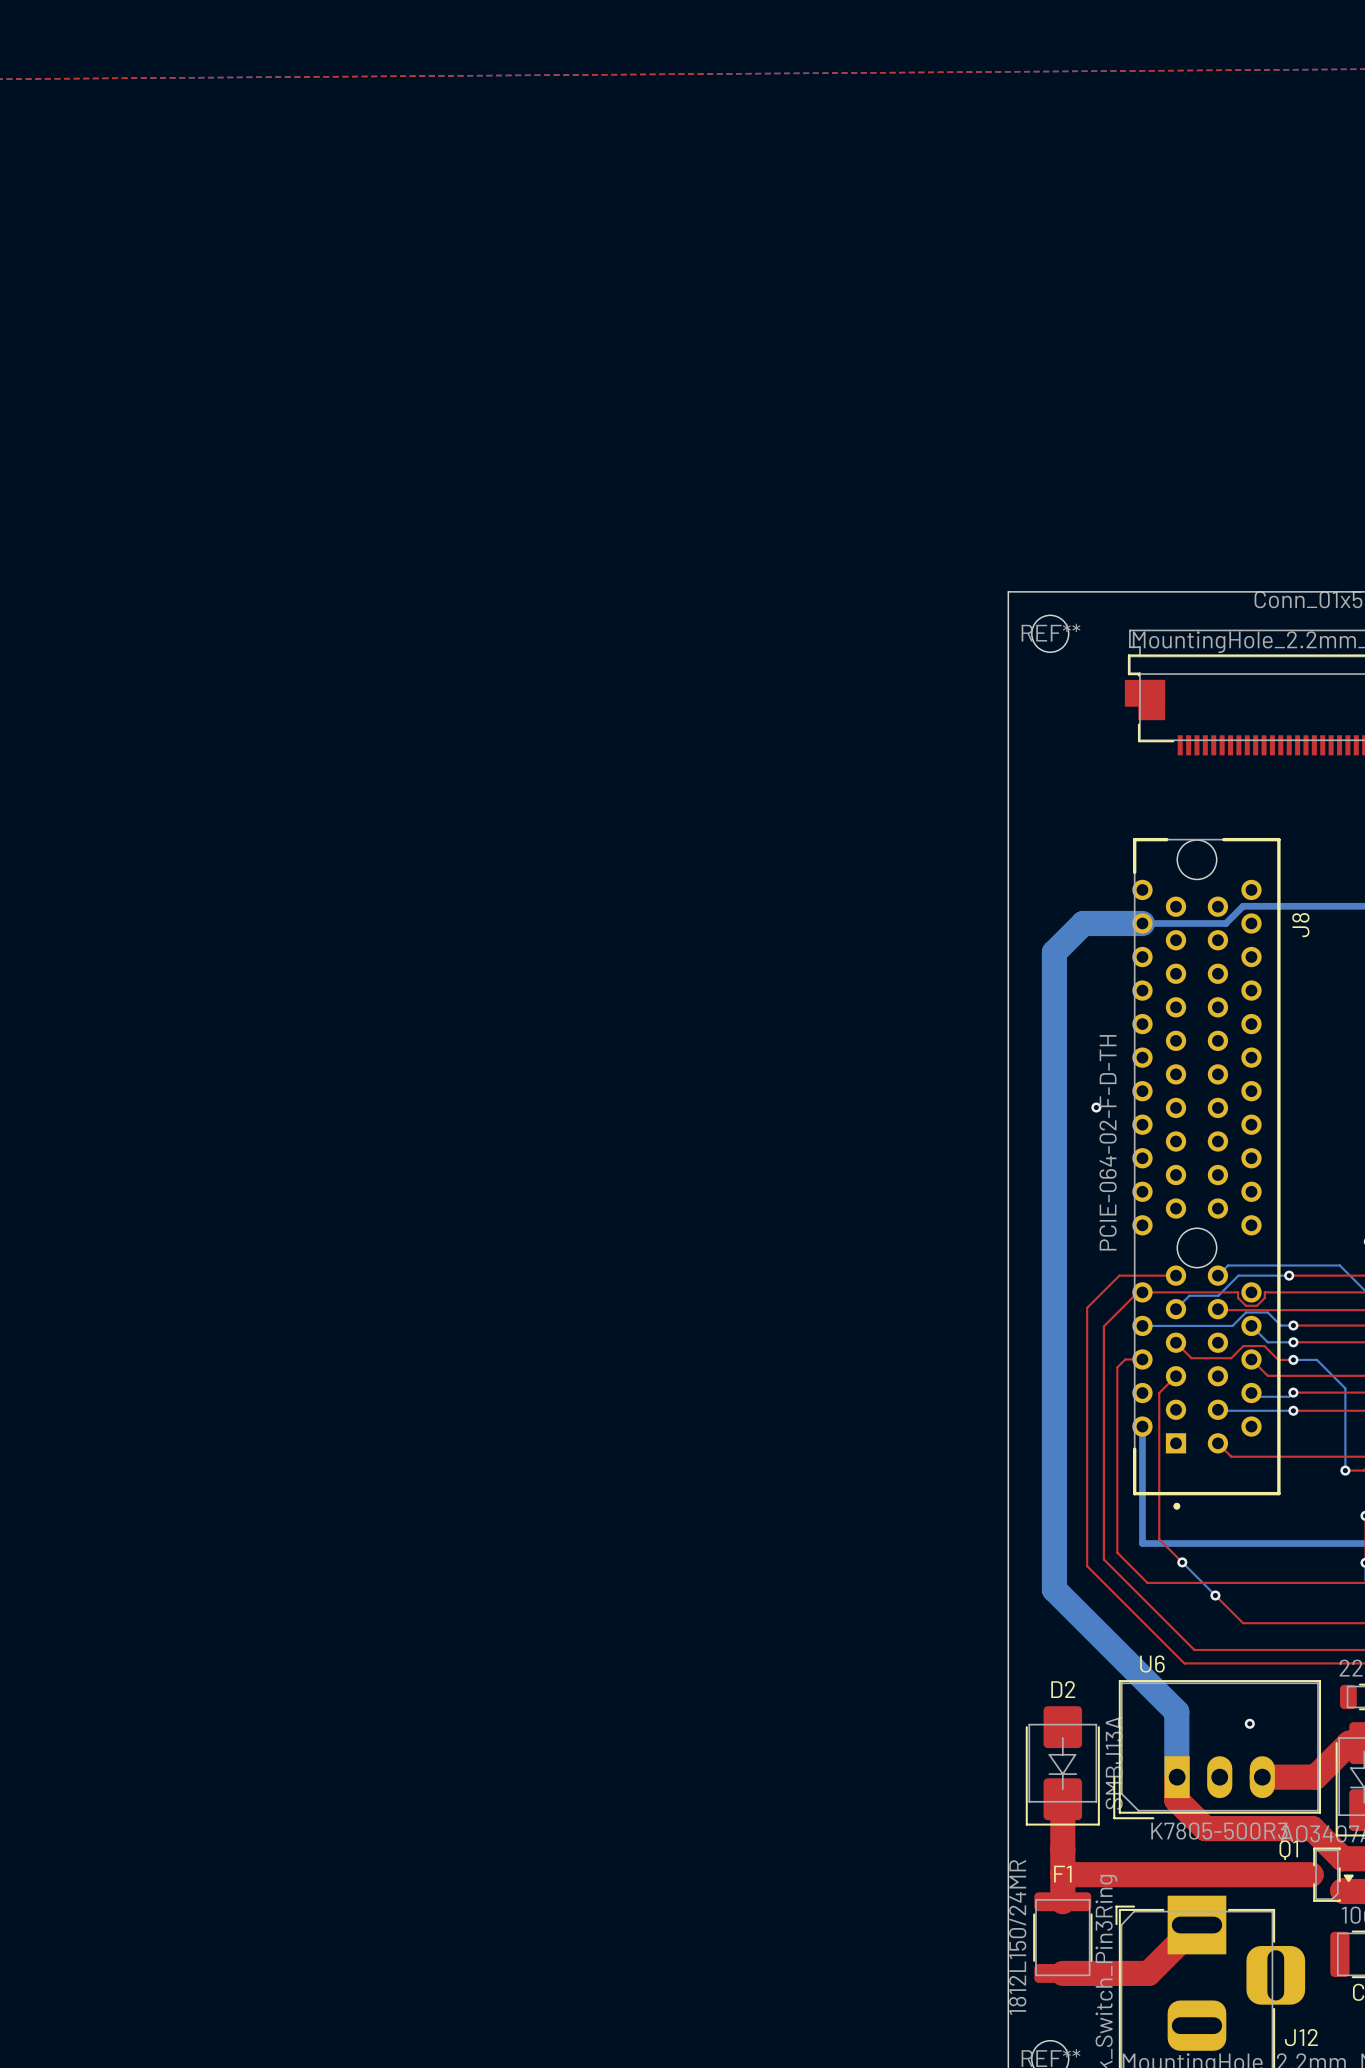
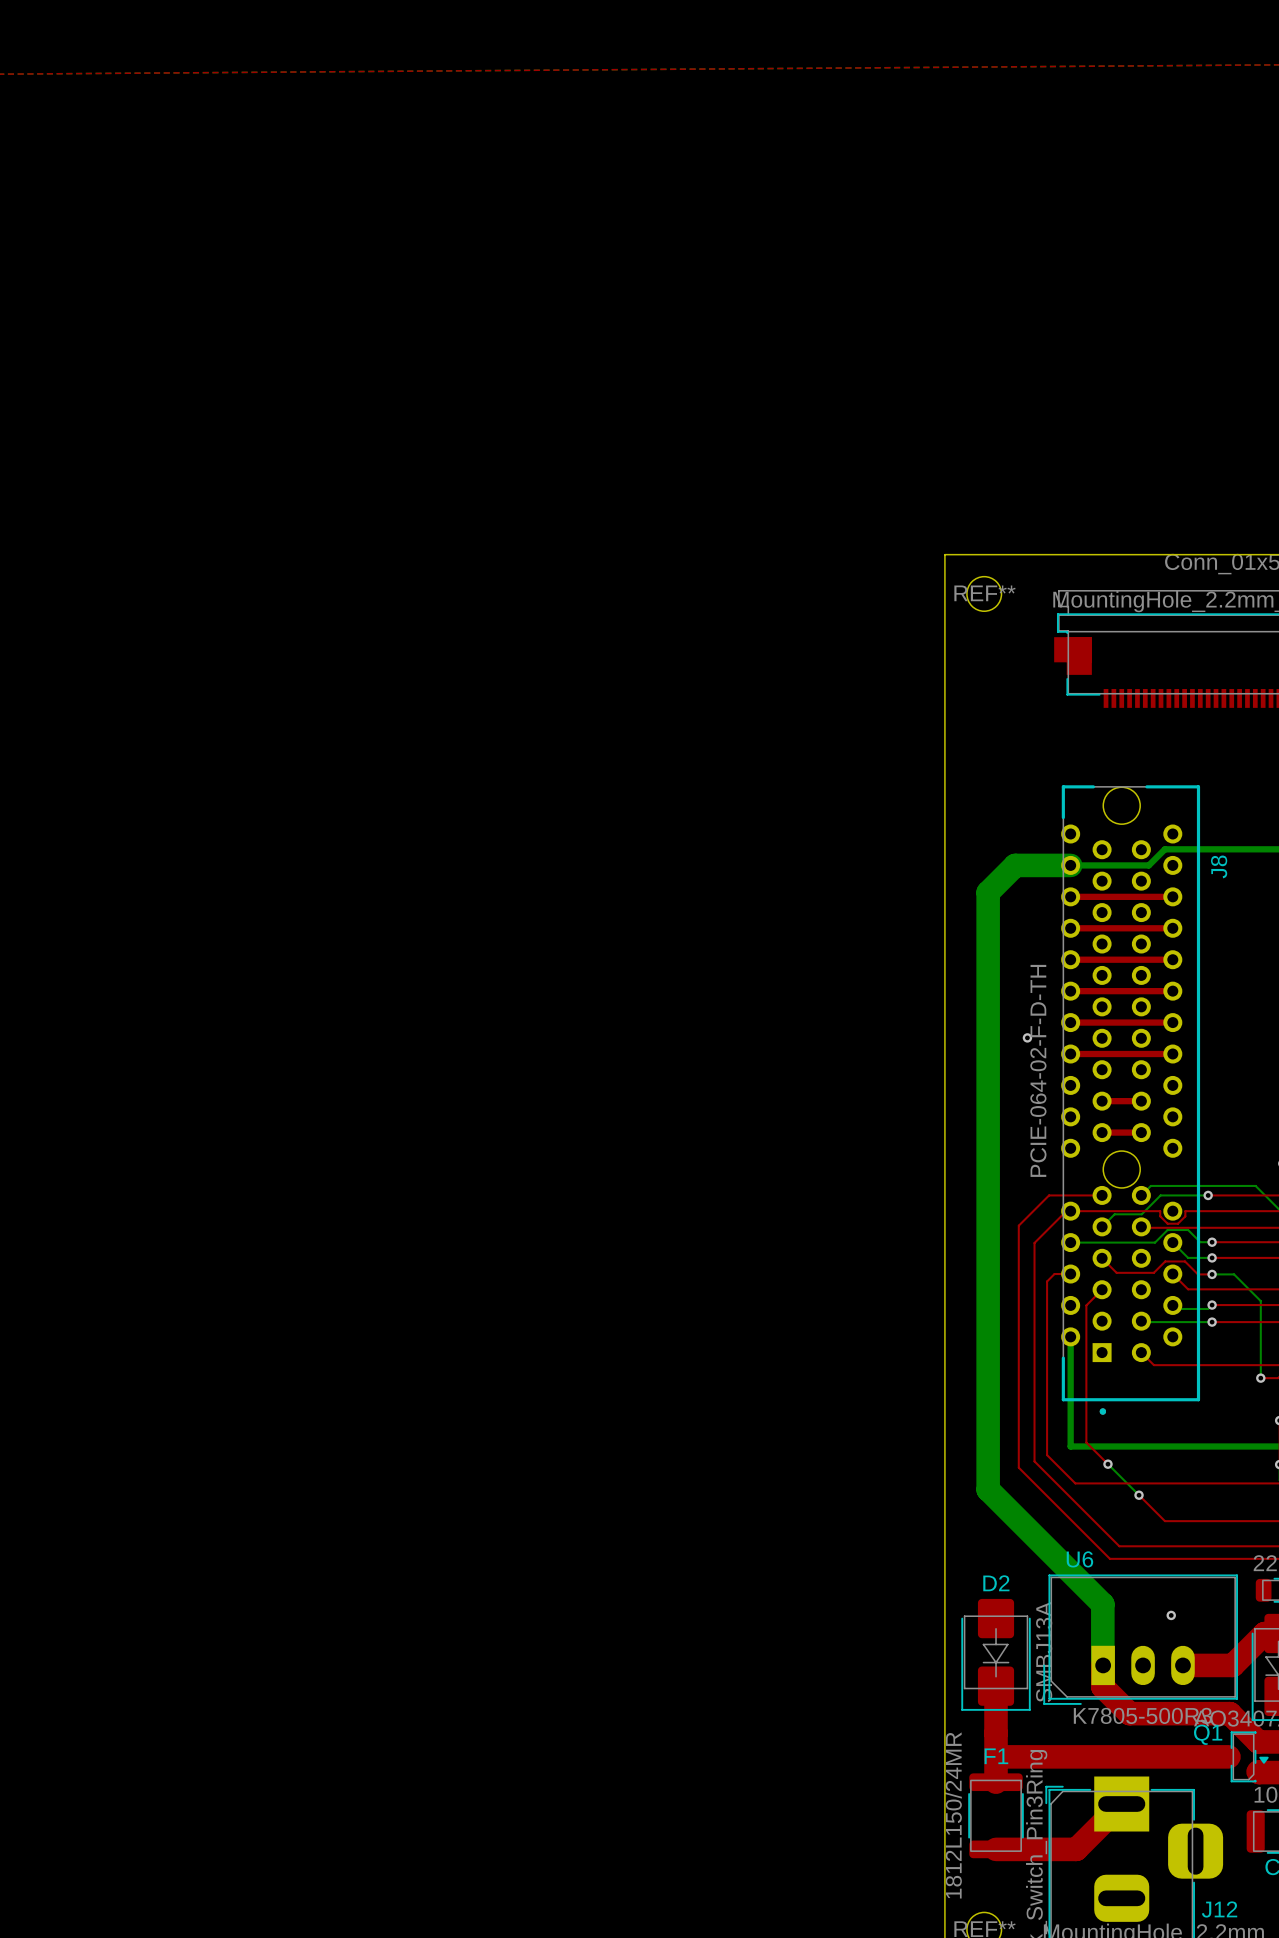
top track: none -> (1070, 896) (1172, 896)
top track: none -> (1070, 928) (1172, 928)
top track: none -> (1070, 959) (1172, 959)
top track: none -> (1070, 991) (1172, 991)
top track: none -> (1070, 1022) (1172, 1022)
top track: none -> (1070, 1054) (1172, 1054)
top track: none -> (1102, 1101) (1141, 1101)
top track: none -> (1102, 1132) (1141, 1132)

